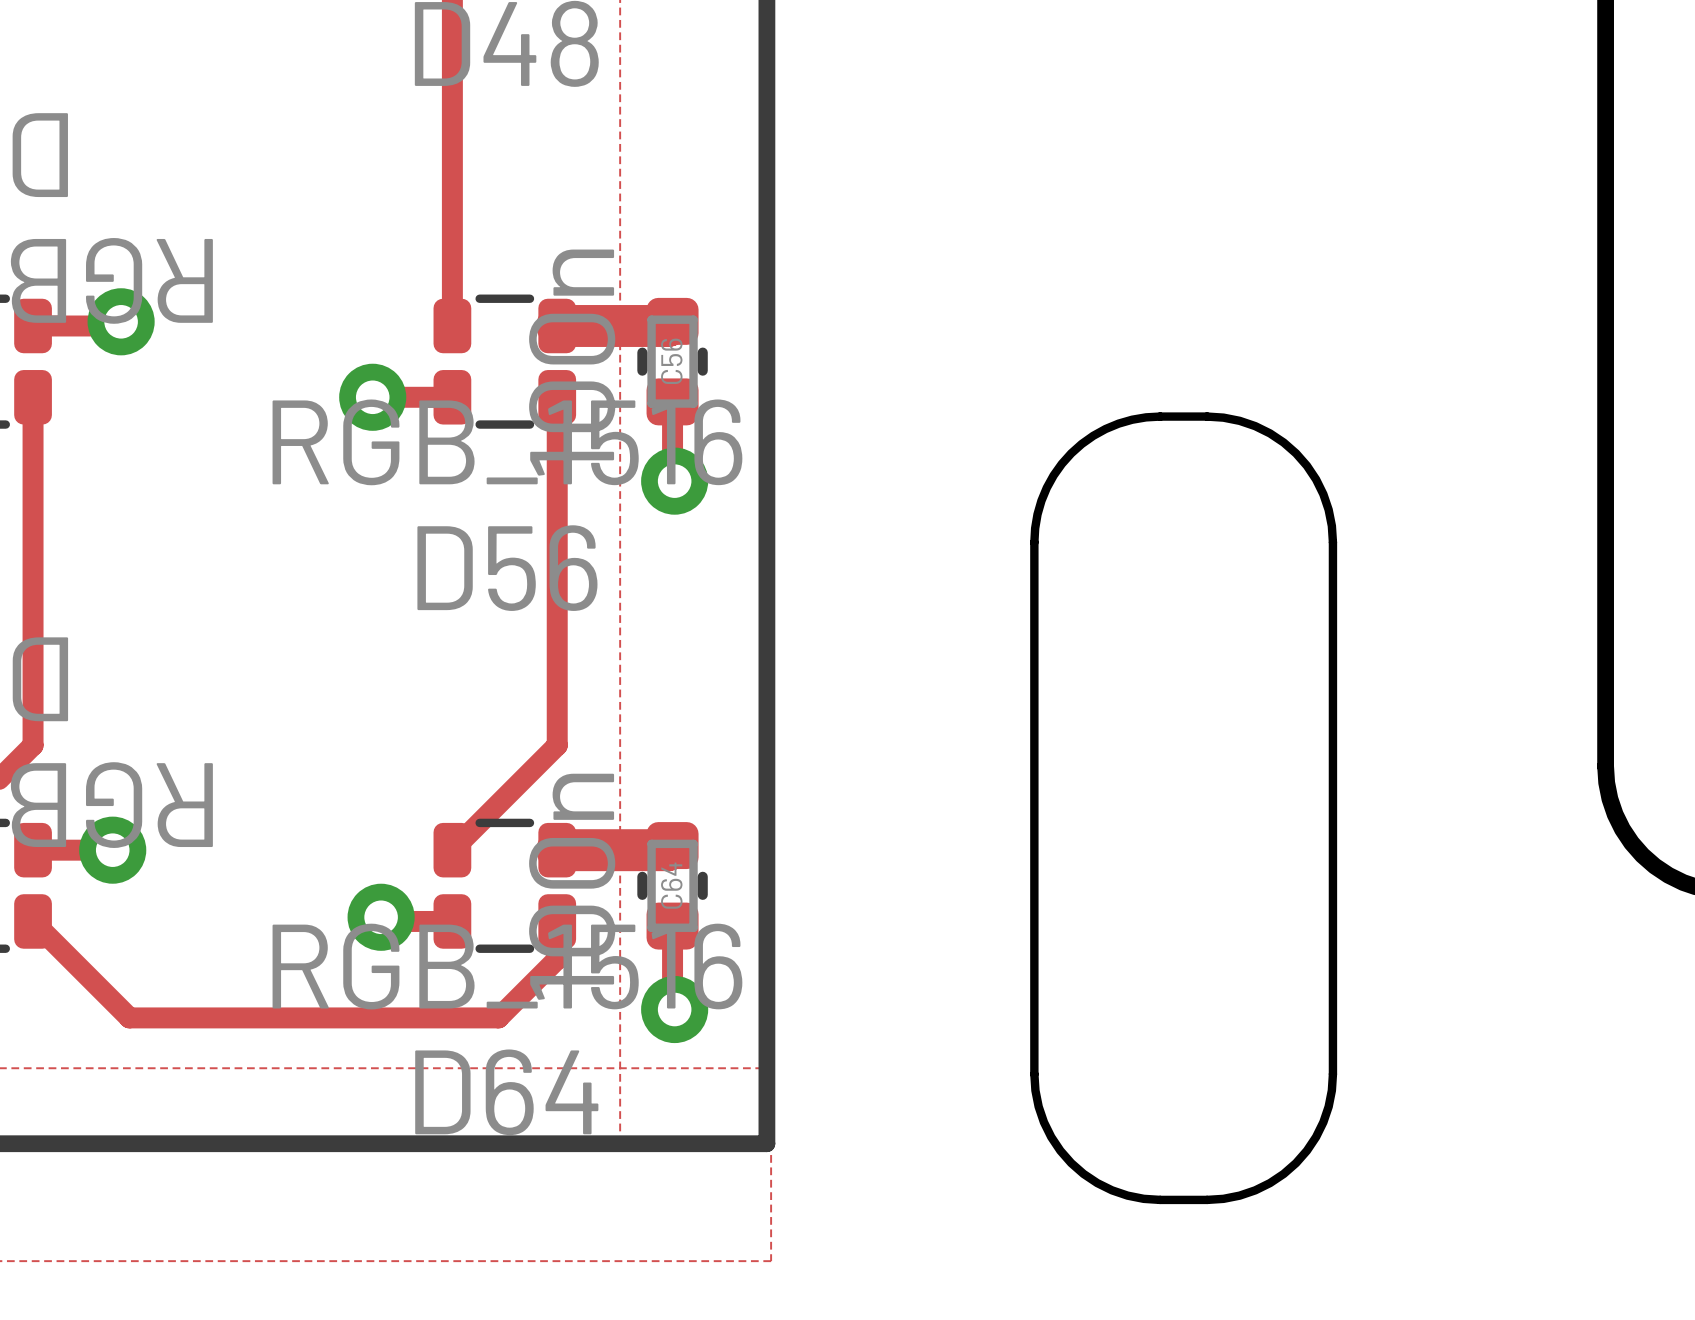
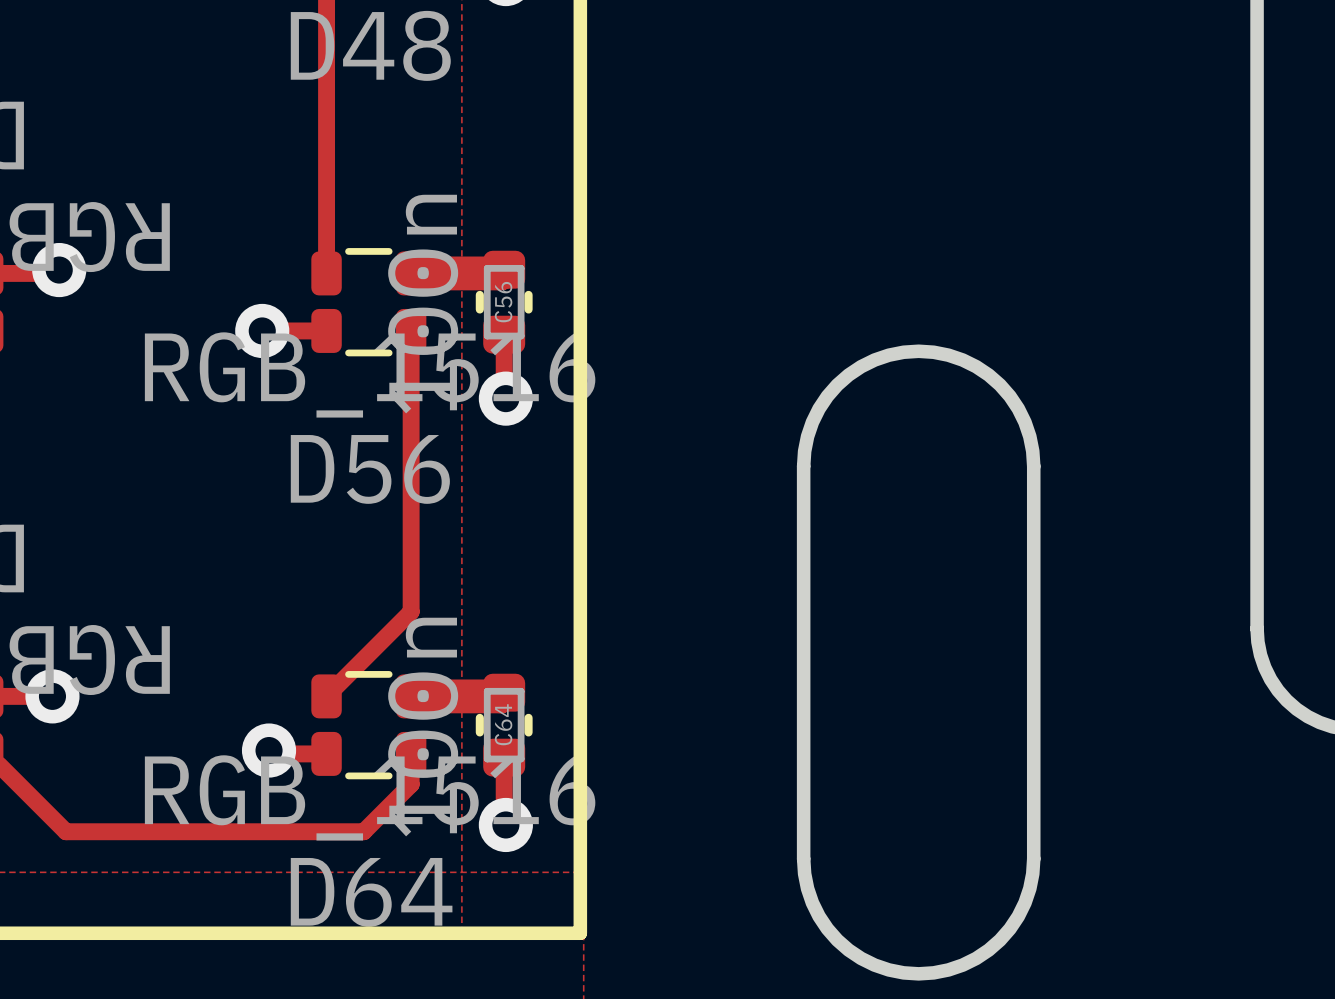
board edge: (1160, 416) (1223, 417) (1239, 420) (1270, 433) (1296, 453) (1316, 479) (1328, 509) (1331, 525) (1331, 1090) (1328, 1106) (1316, 1137) (1296, 1163) (1270, 1183) (1239, 1195) (1223, 1198) (1143, 1198) (1112, 1190) (1097, 1183) (1071, 1163) (1060, 1150) (1043, 1122) (1035, 1090) (1034, 542) (1037, 514) (1041, 500) (1053, 475) (1071, 453) (1081, 444) (1093, 435) (1118, 423) (1146, 417) (1160, 416) -> (803, 466) (803, 858) (807, 888) (819, 916) (827, 928) (837, 940) (861, 958) (888, 969) (903, 972) (918, 973) (948, 969) (976, 958) (1000, 940) (1018, 916) (1024, 902) (1032, 873) (1033, 466) (1029, 436) (1018, 408) (1009, 396) (988, 375) (962, 360) (948, 355) (918, 351) (903, 352) (888, 355) (861, 366) (848, 375) (827, 396) (819, 408) (807, 436) (803, 466)

